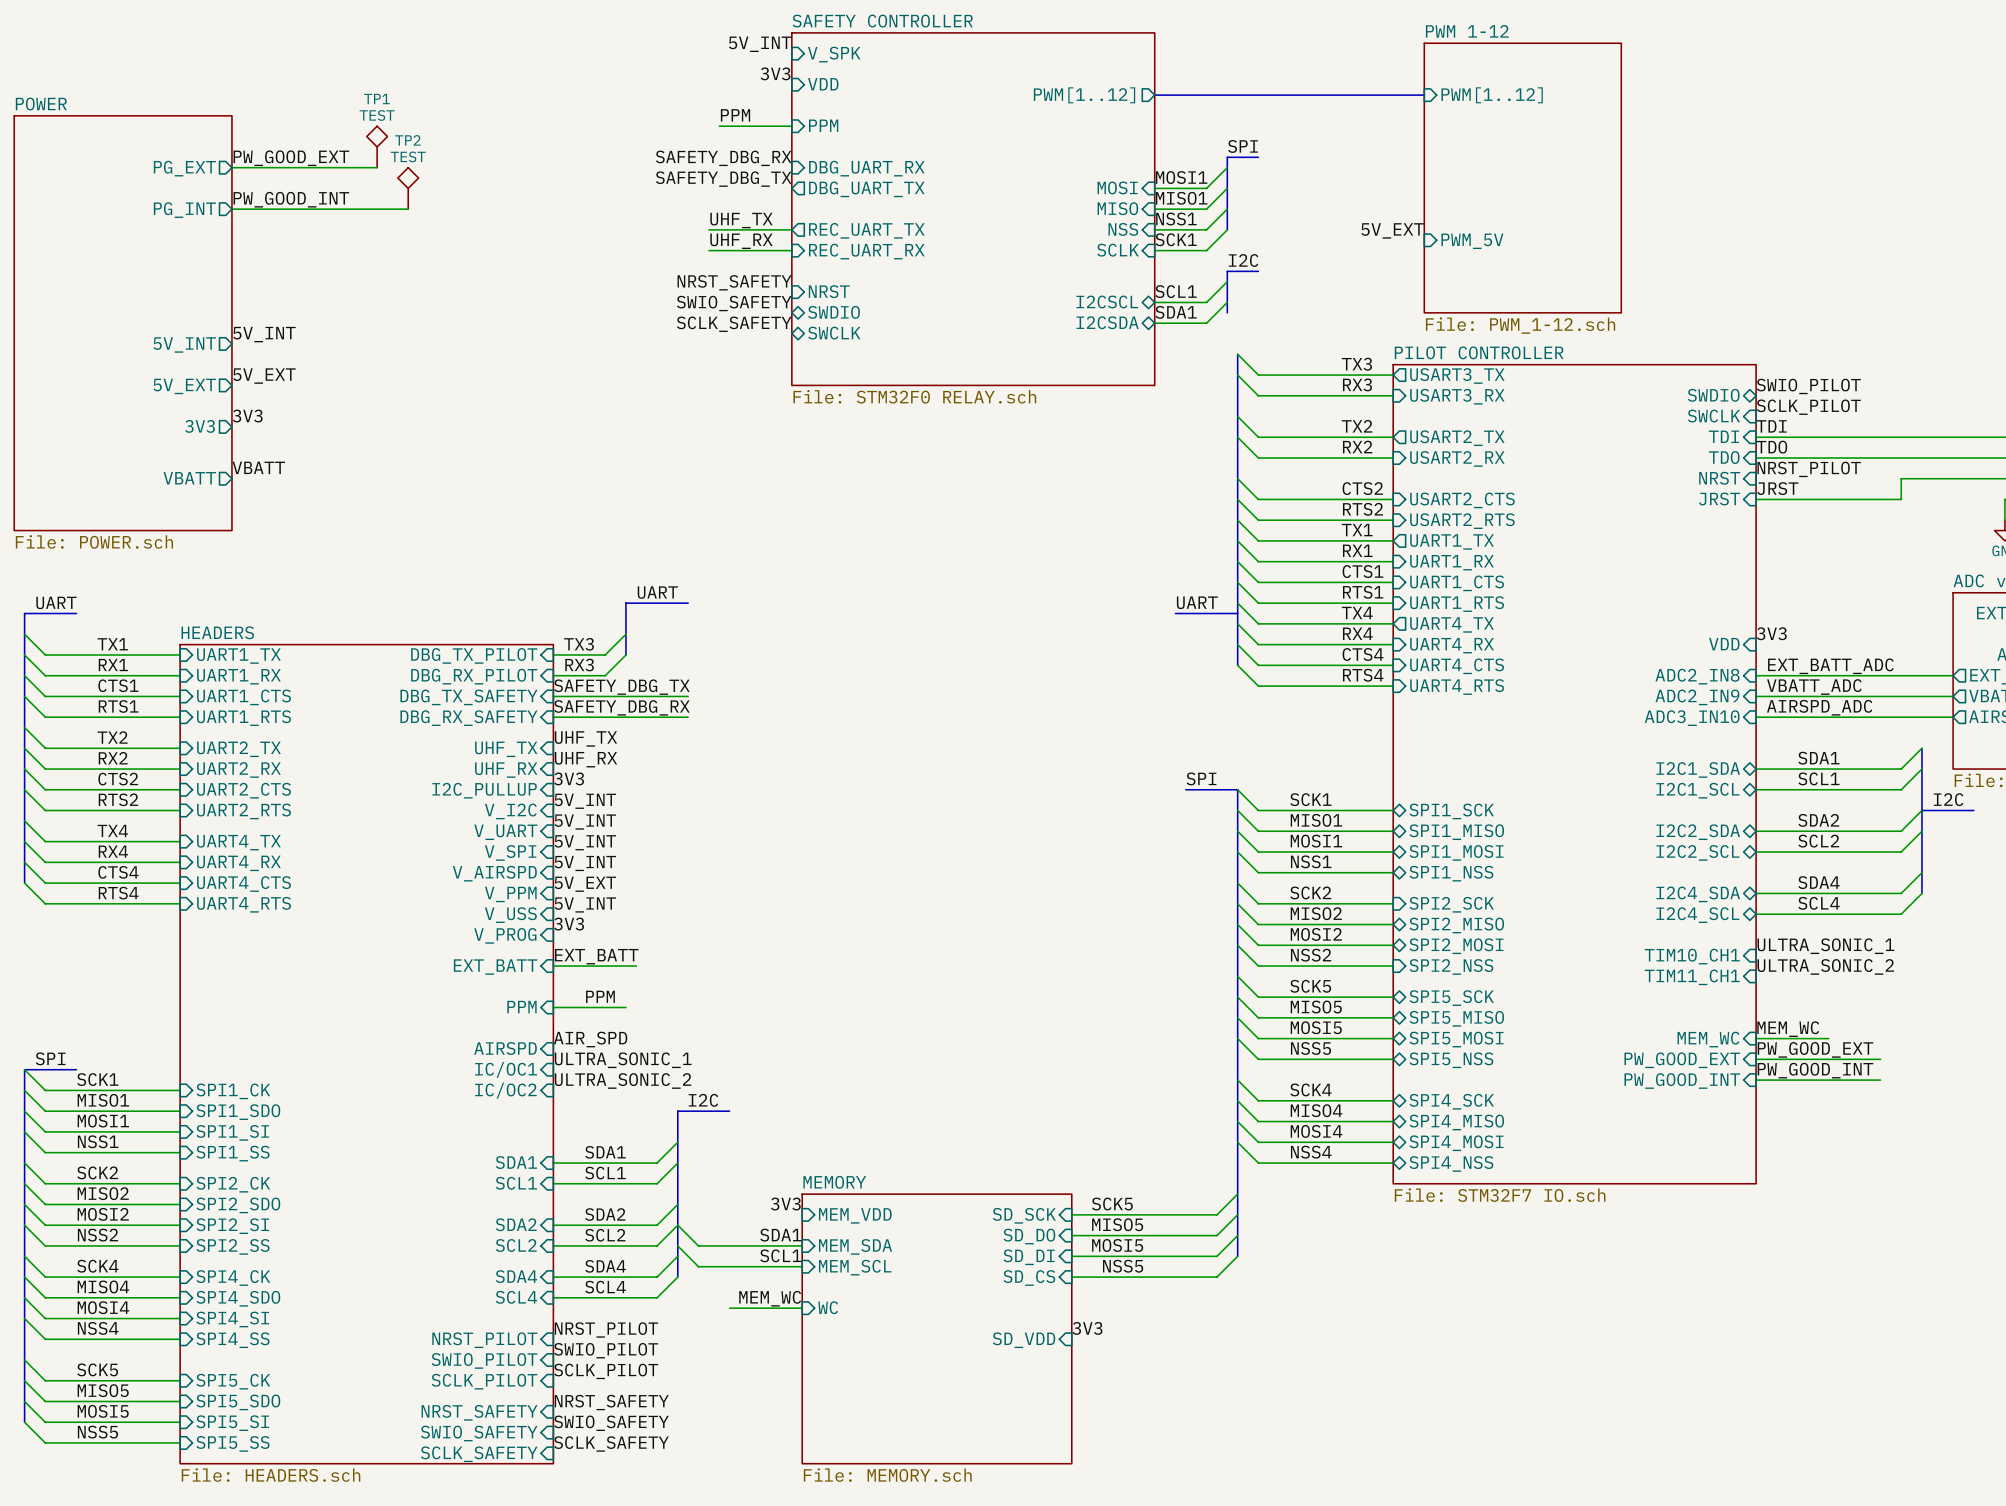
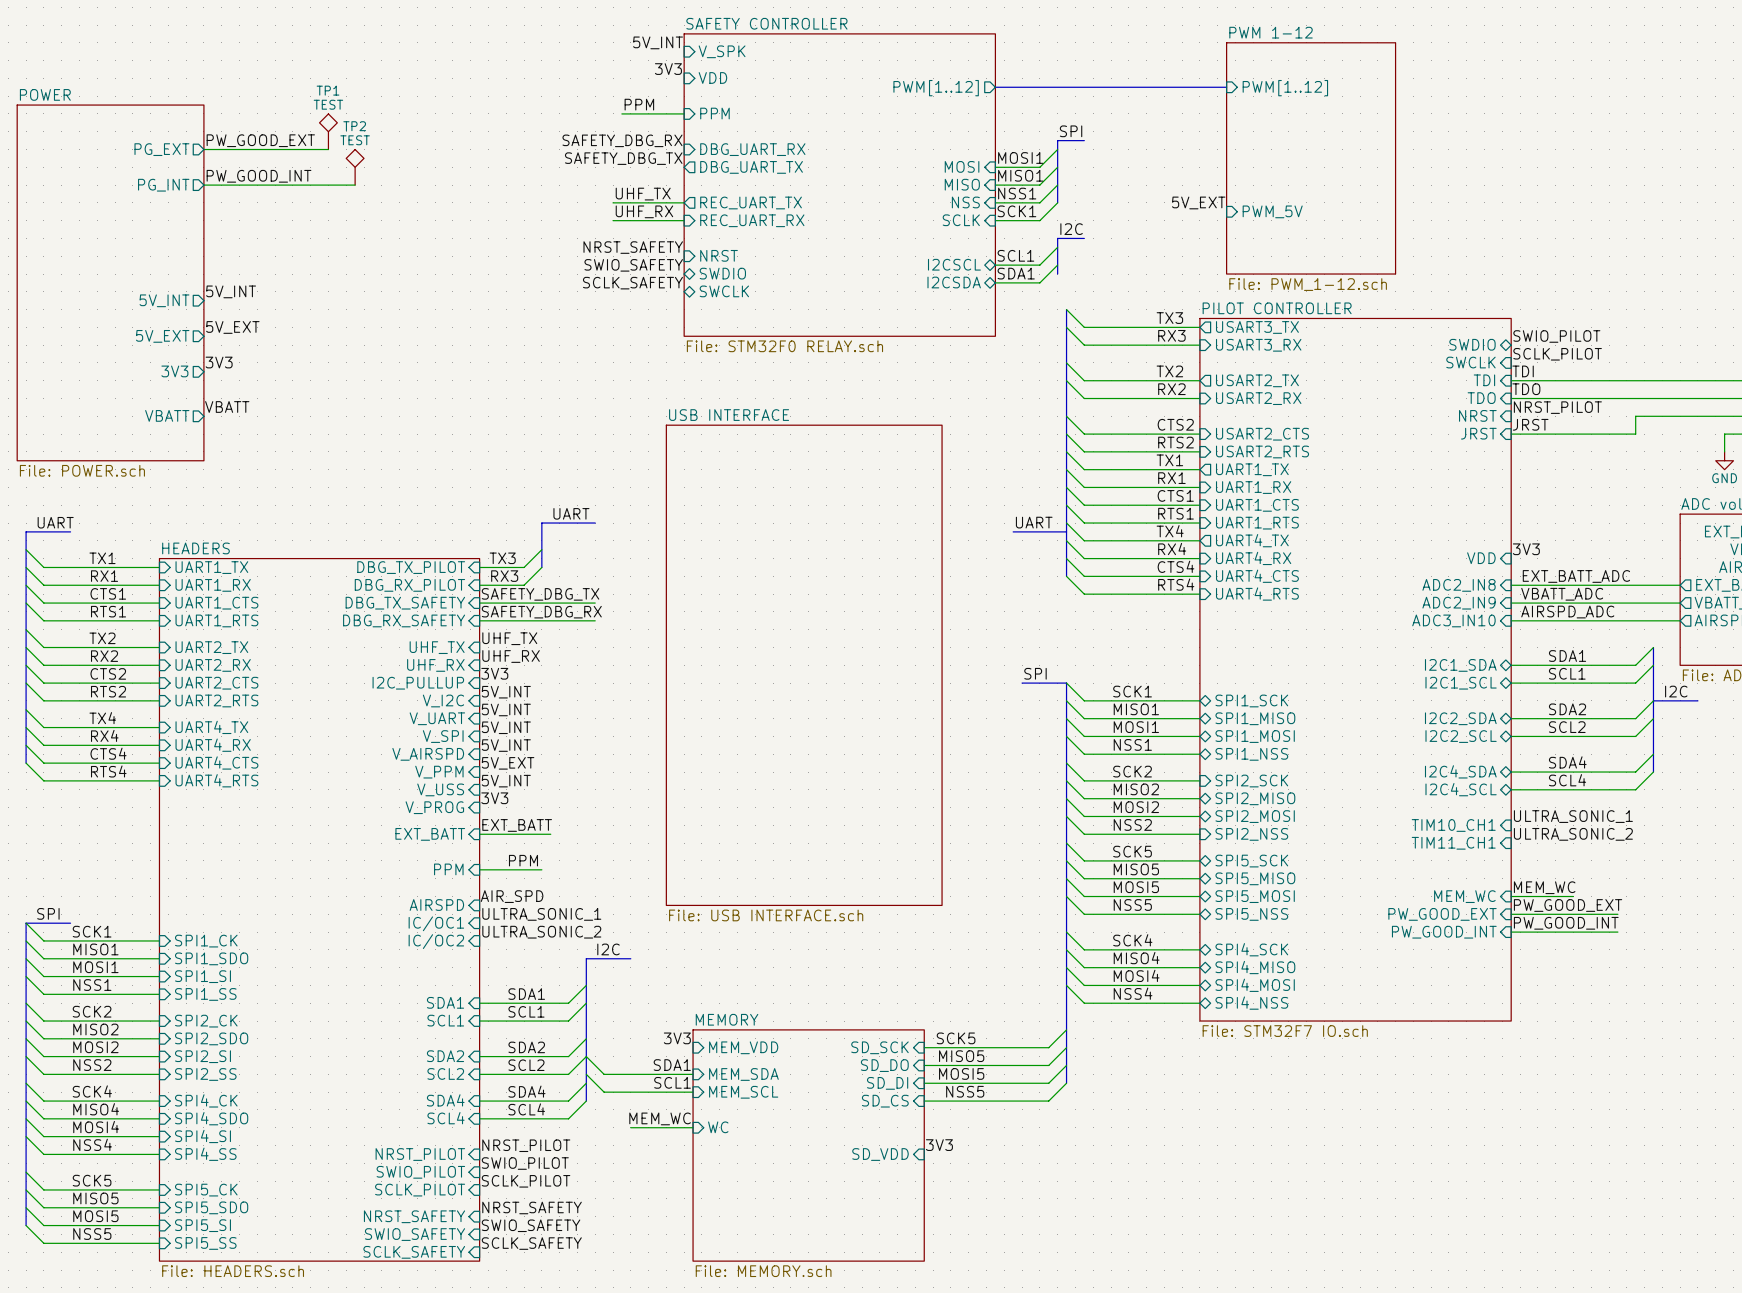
sheet USB INTERFACE: none -> File: USB INTERFACE.sch (804, 665)

